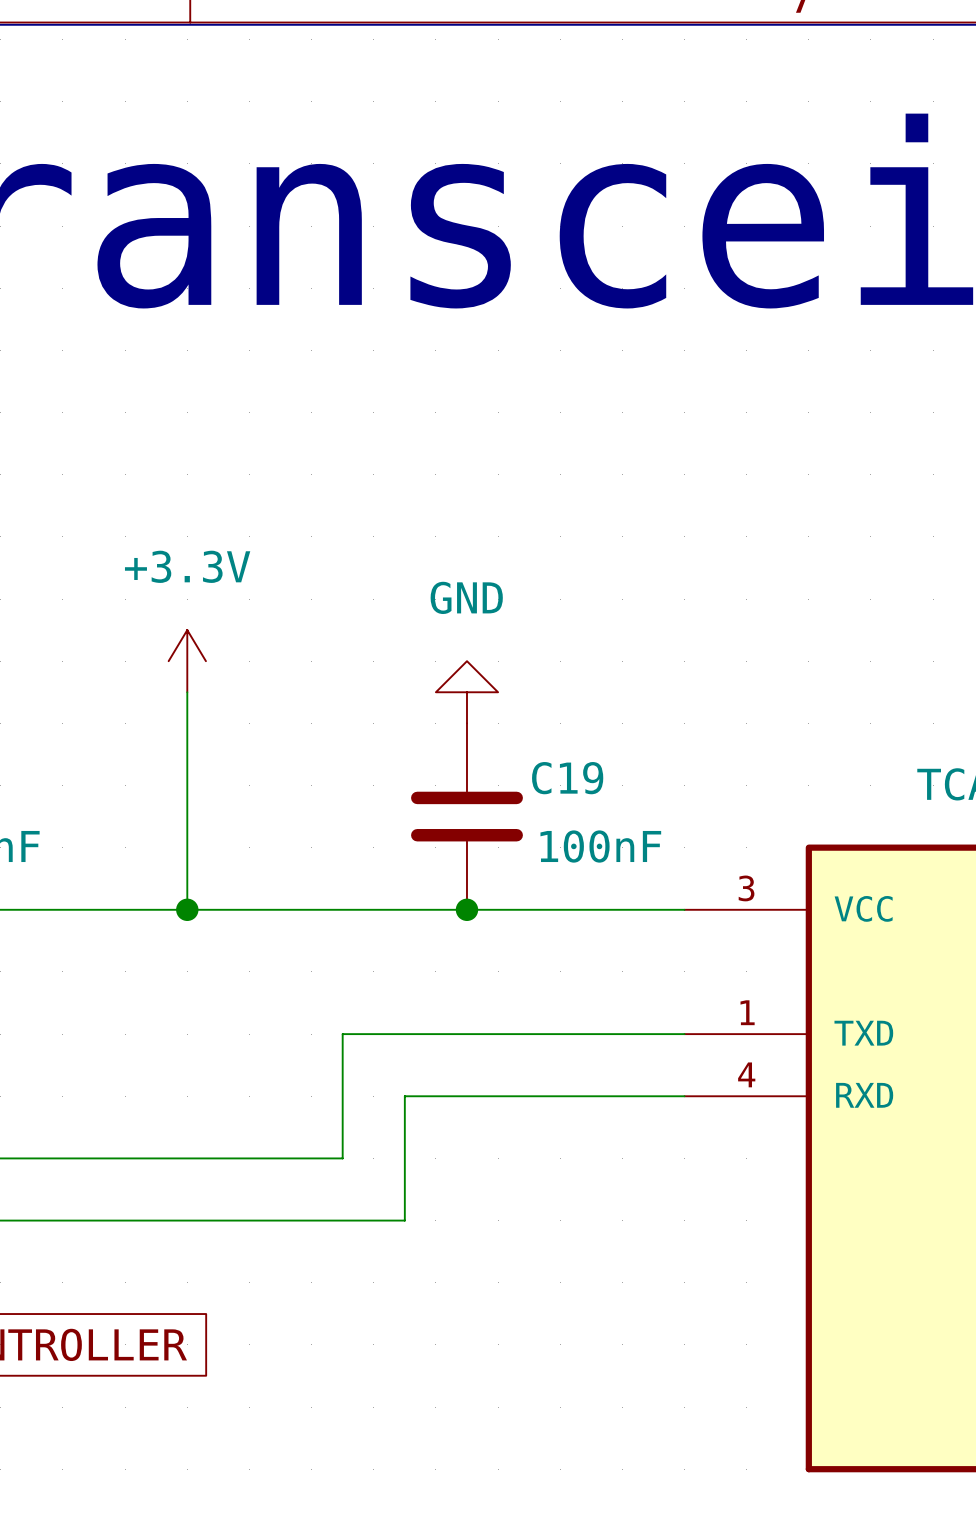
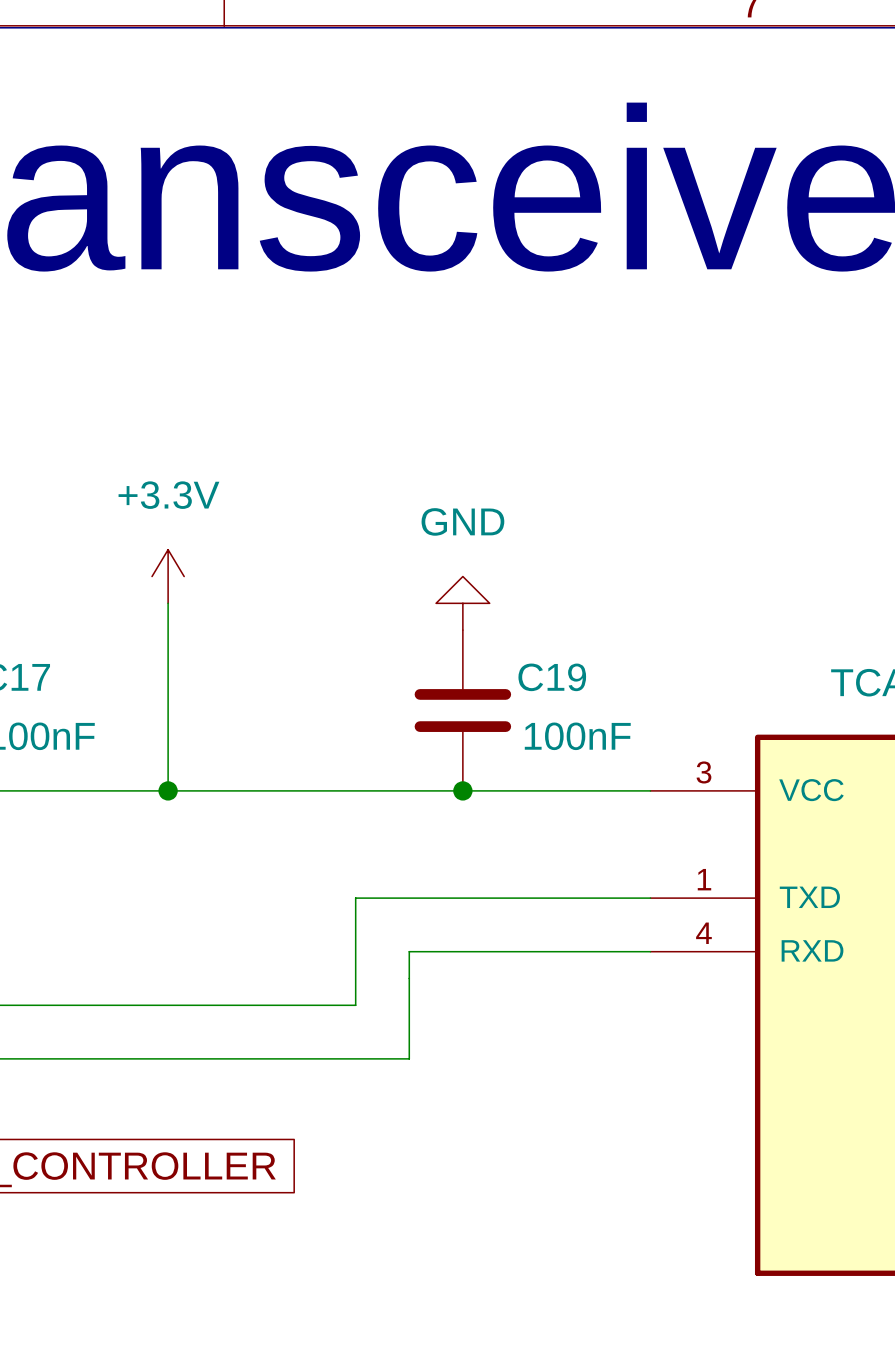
power symbol position: +3.3V (187, 661) -> +3.3V (168, 576)
wire: (187, 692) (187, 909) -> (168, 603) (168, 790)
junction position: (187, 909) -> (168, 790)

